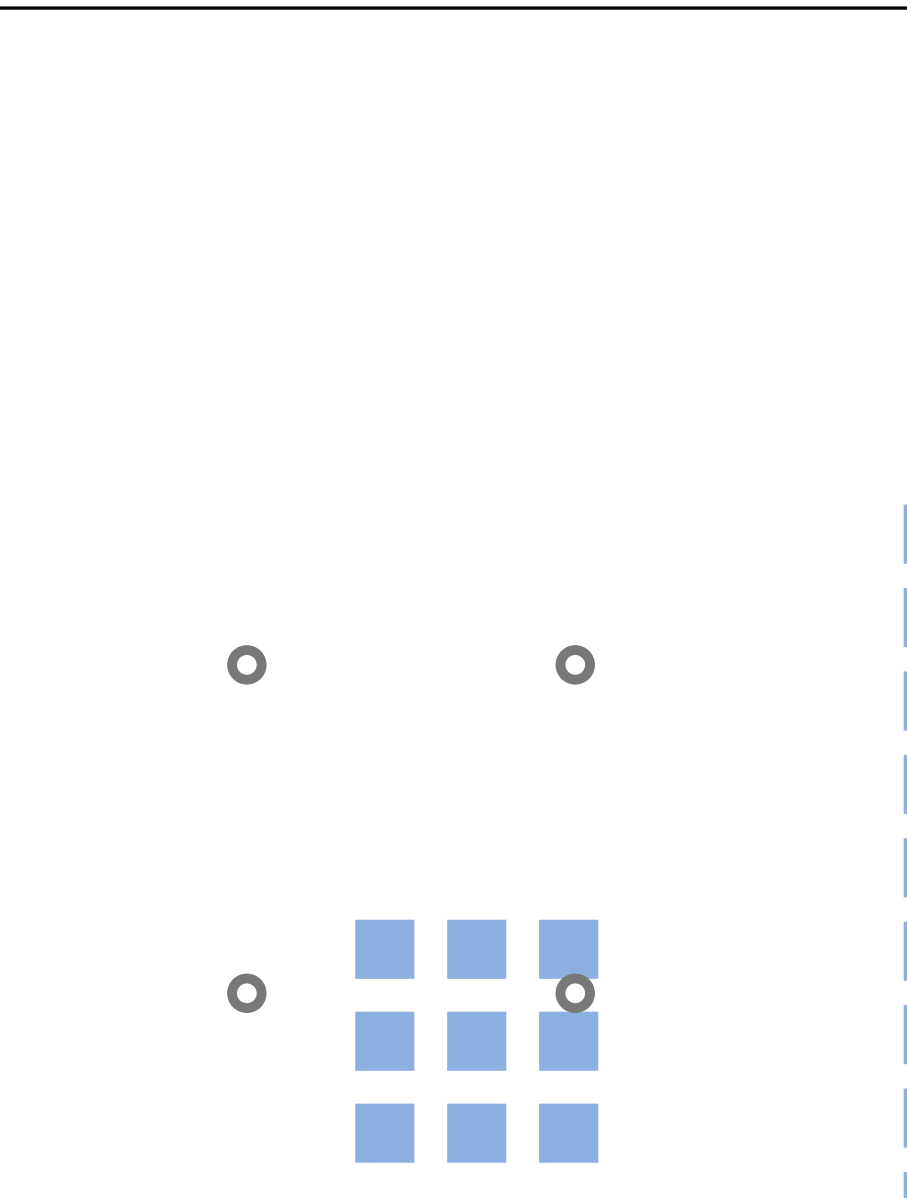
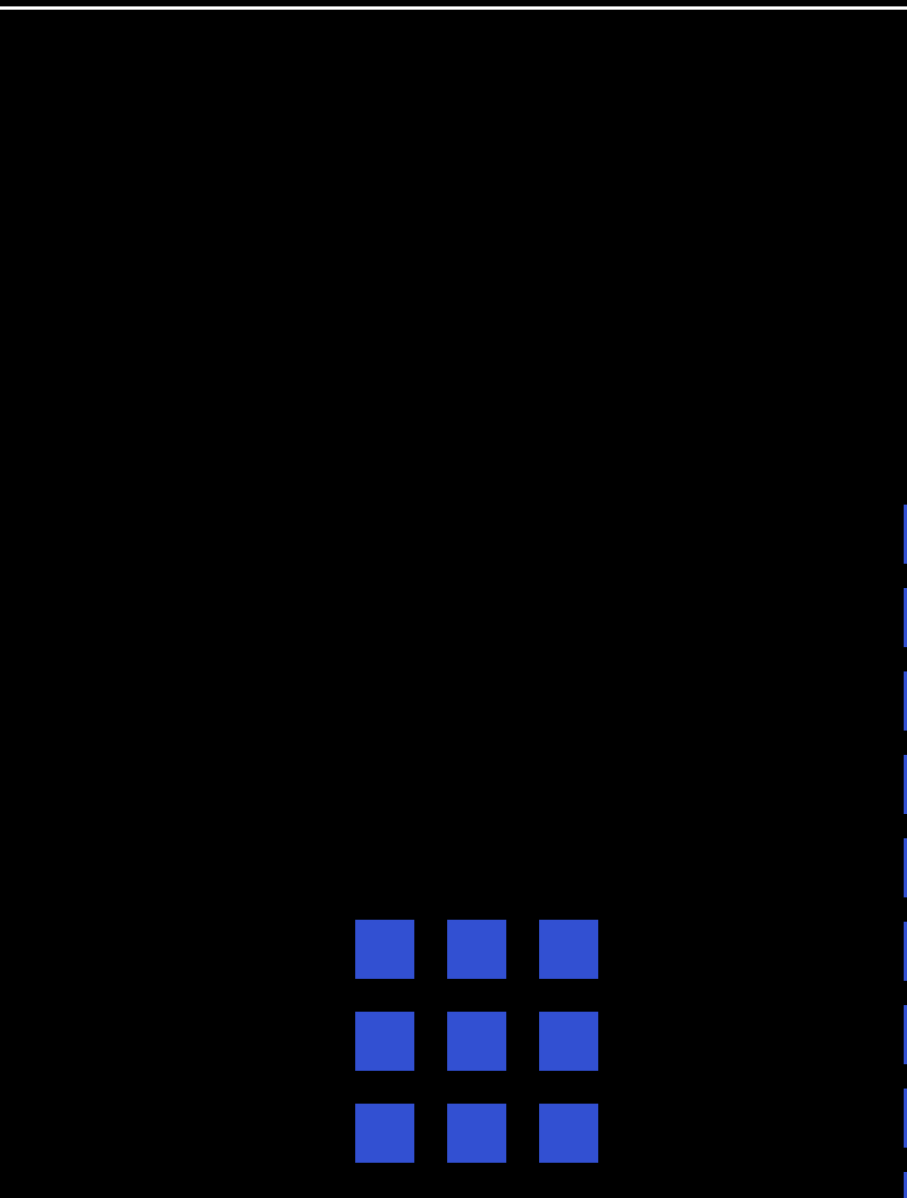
via: (246, 664) -> none
via: (575, 664) -> none
via: (246, 993) -> none
via: (575, 993) -> none

